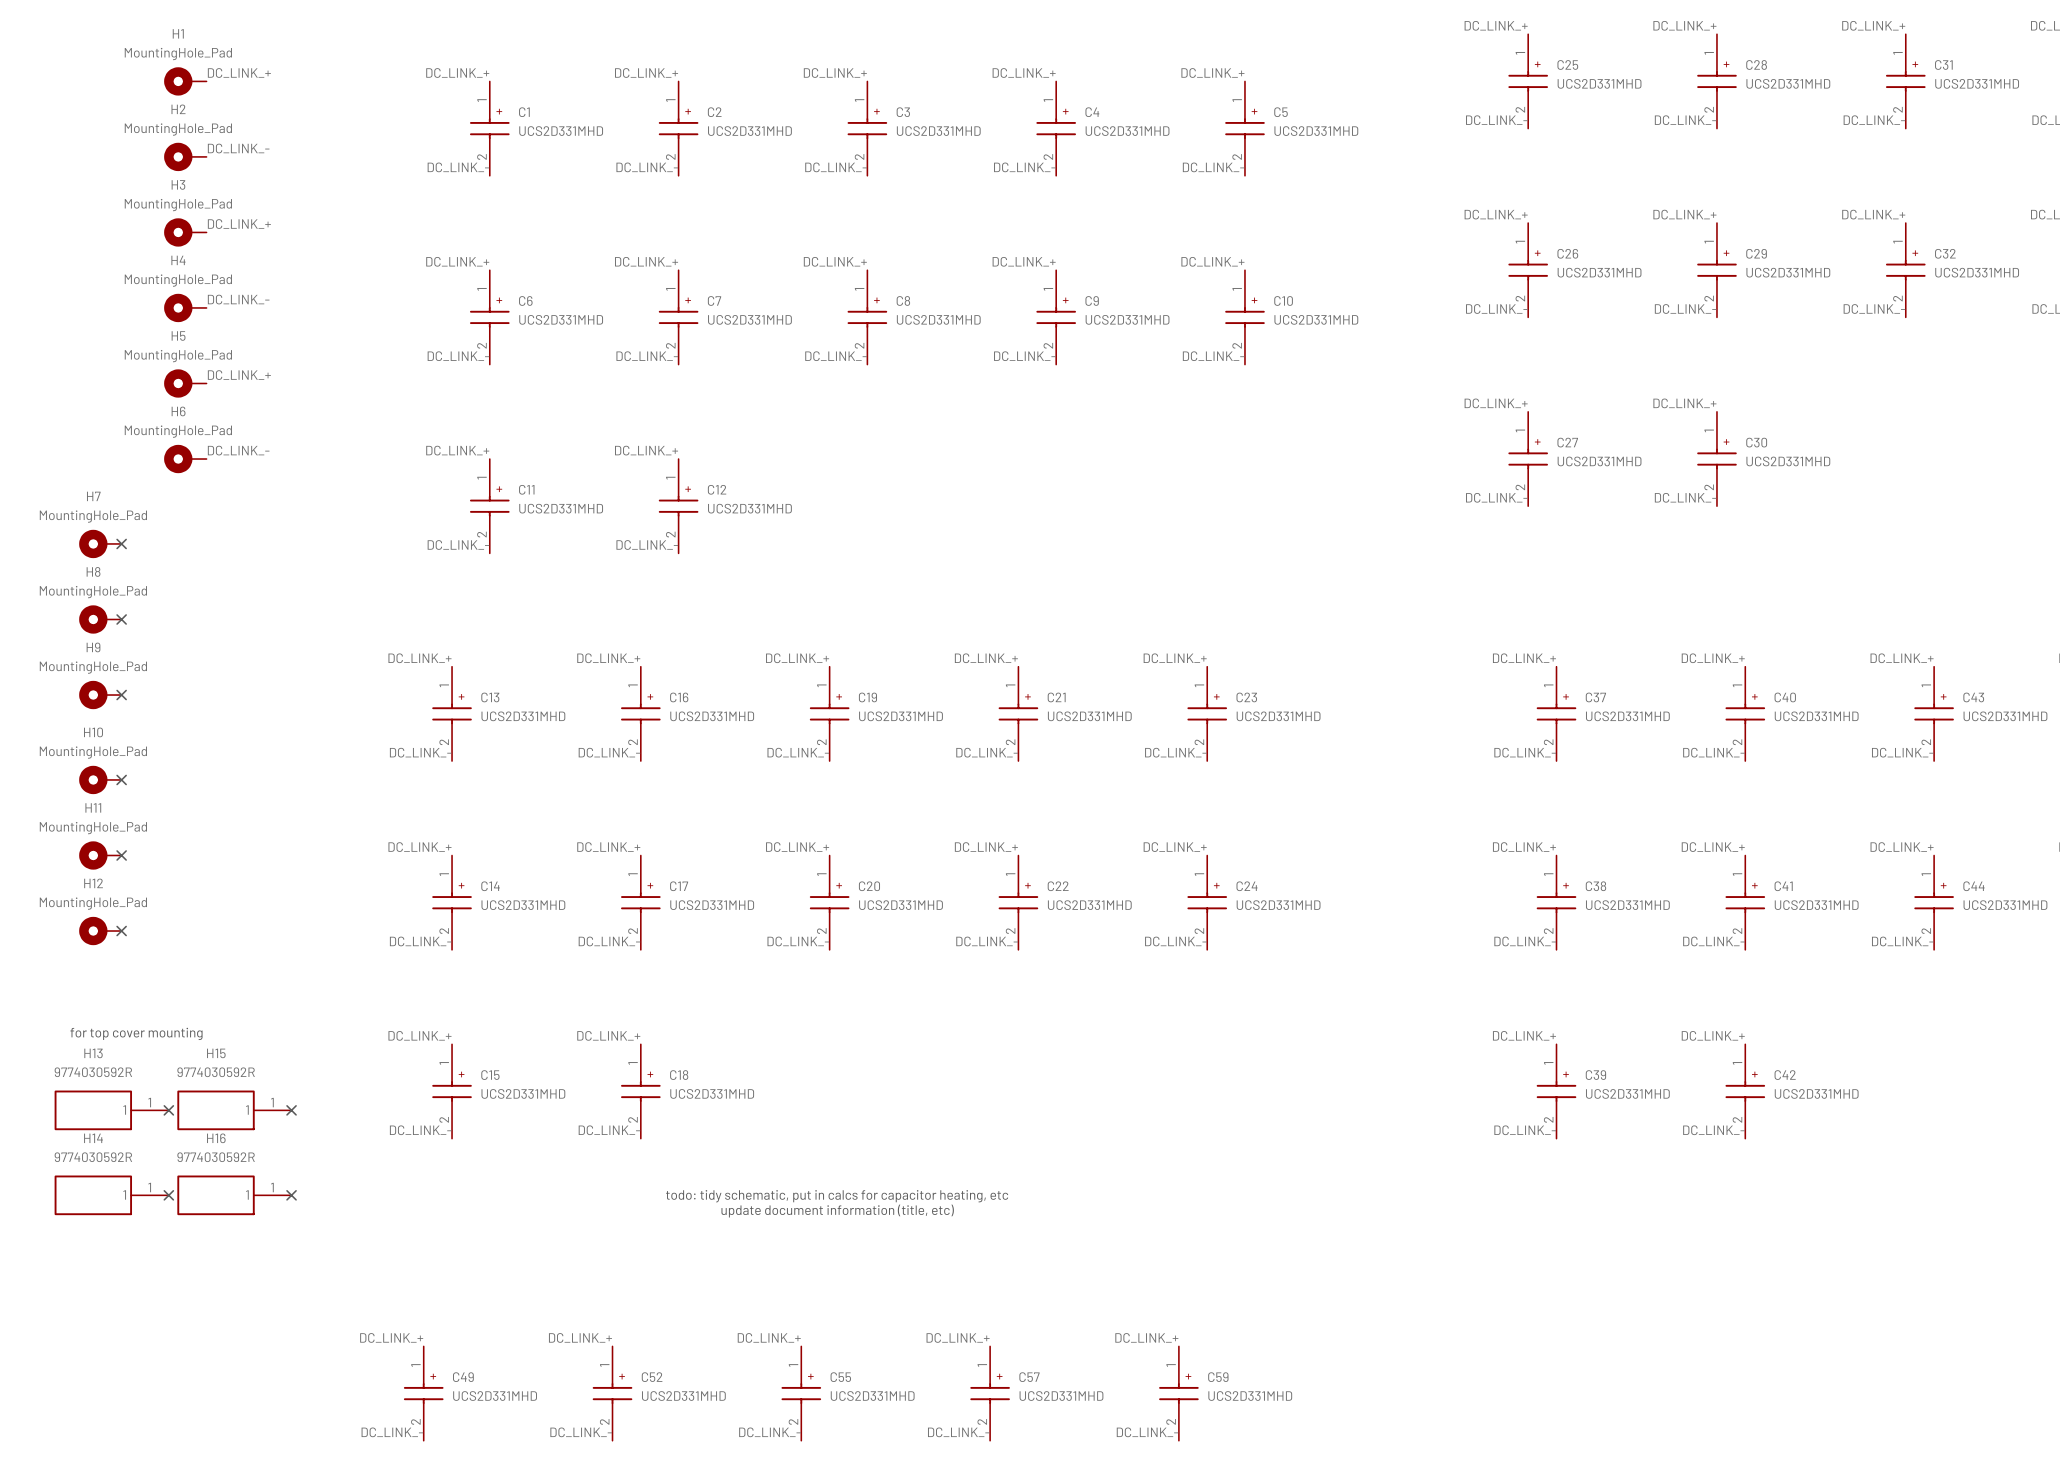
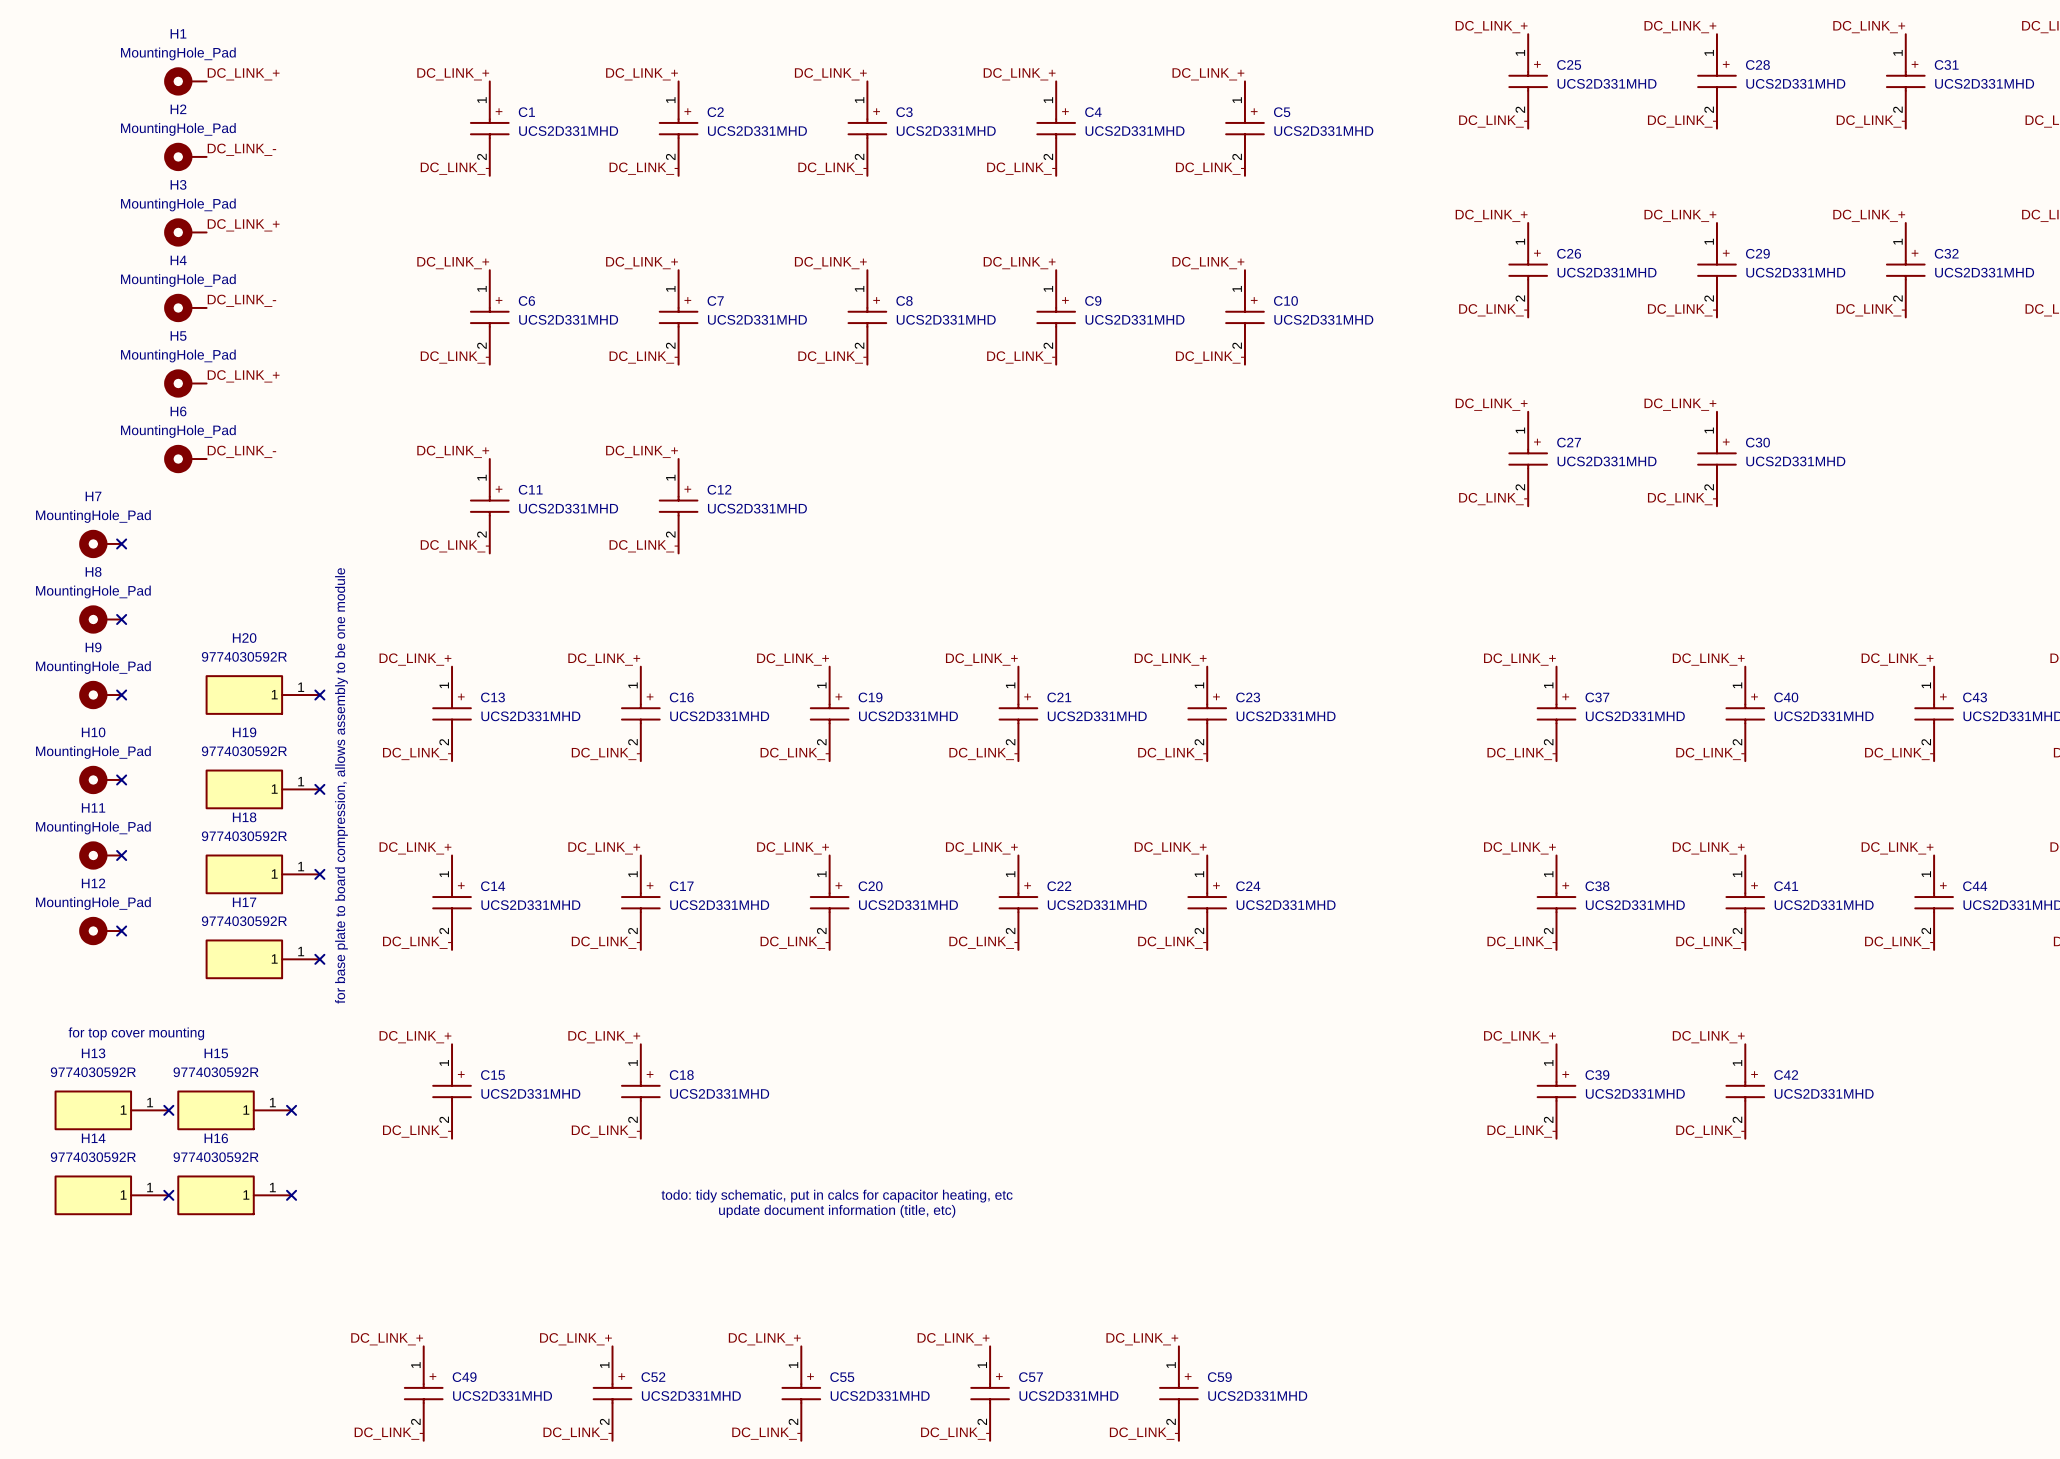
H20: none -> 9774030592R (262, 695)
no-connect mark: none -> (319, 695)
text: none -> for base plate to board compression, allows assembly to be one module (341, 785)
H19: none -> 9774030592R (262, 789)
no-connect mark: none -> (319, 789)
H18: none -> 9774030592R (262, 874)
no-connect mark: none -> (319, 874)
H17: none -> 9774030592R (262, 959)
no-connect mark: none -> (319, 959)

